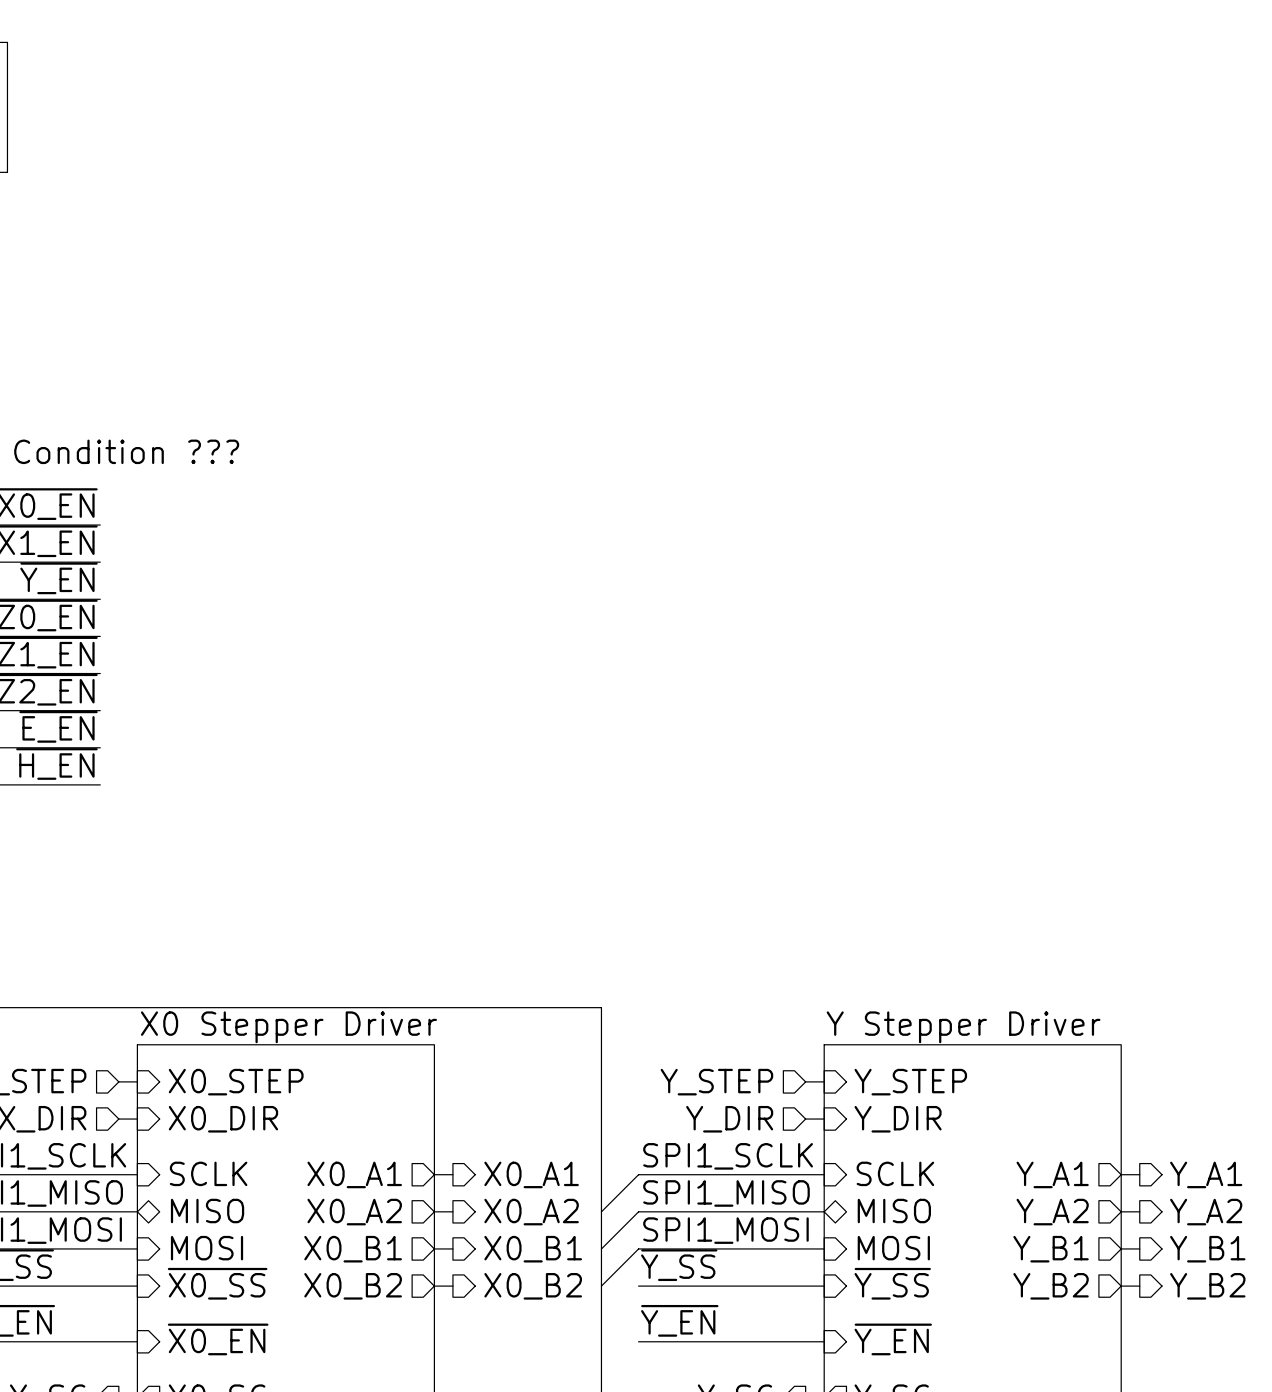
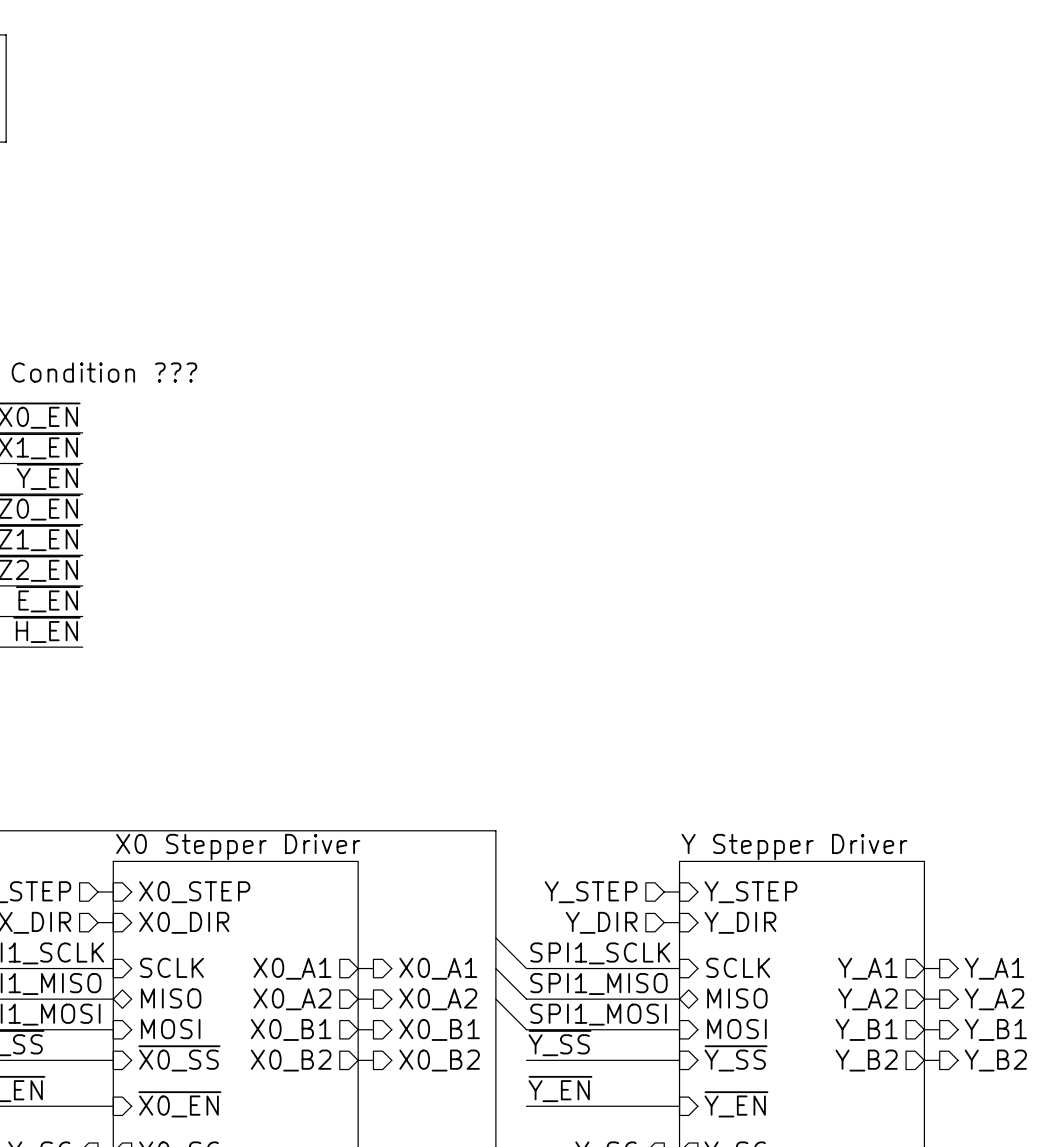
wire: (638, 1174) (601, 1211) -> (526, 968) (495, 937)
wire: (638, 1211) (601, 1248) -> (526, 999) (495, 968)
wire: (638, 1248) (601, 1286) -> (526, 1029) (495, 999)

